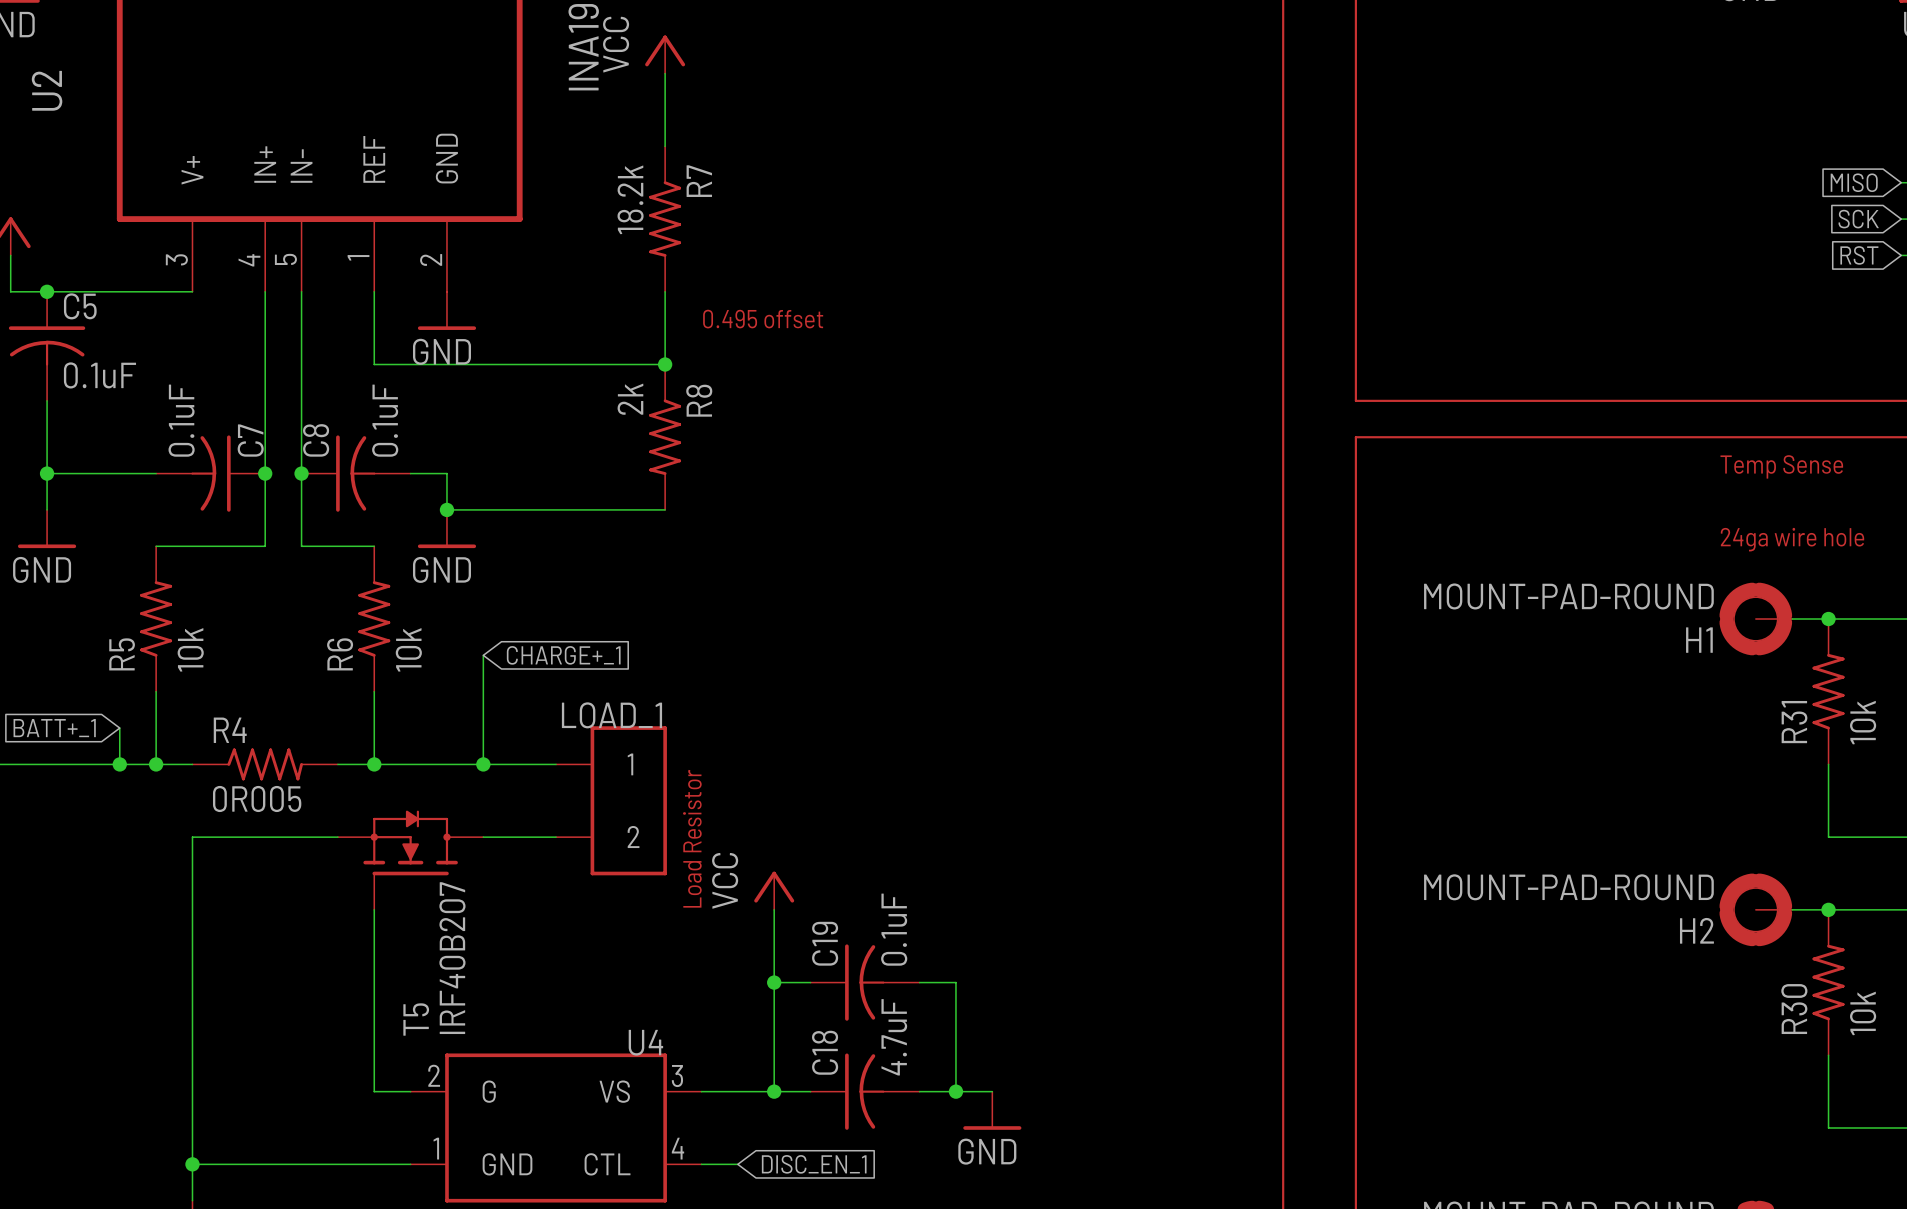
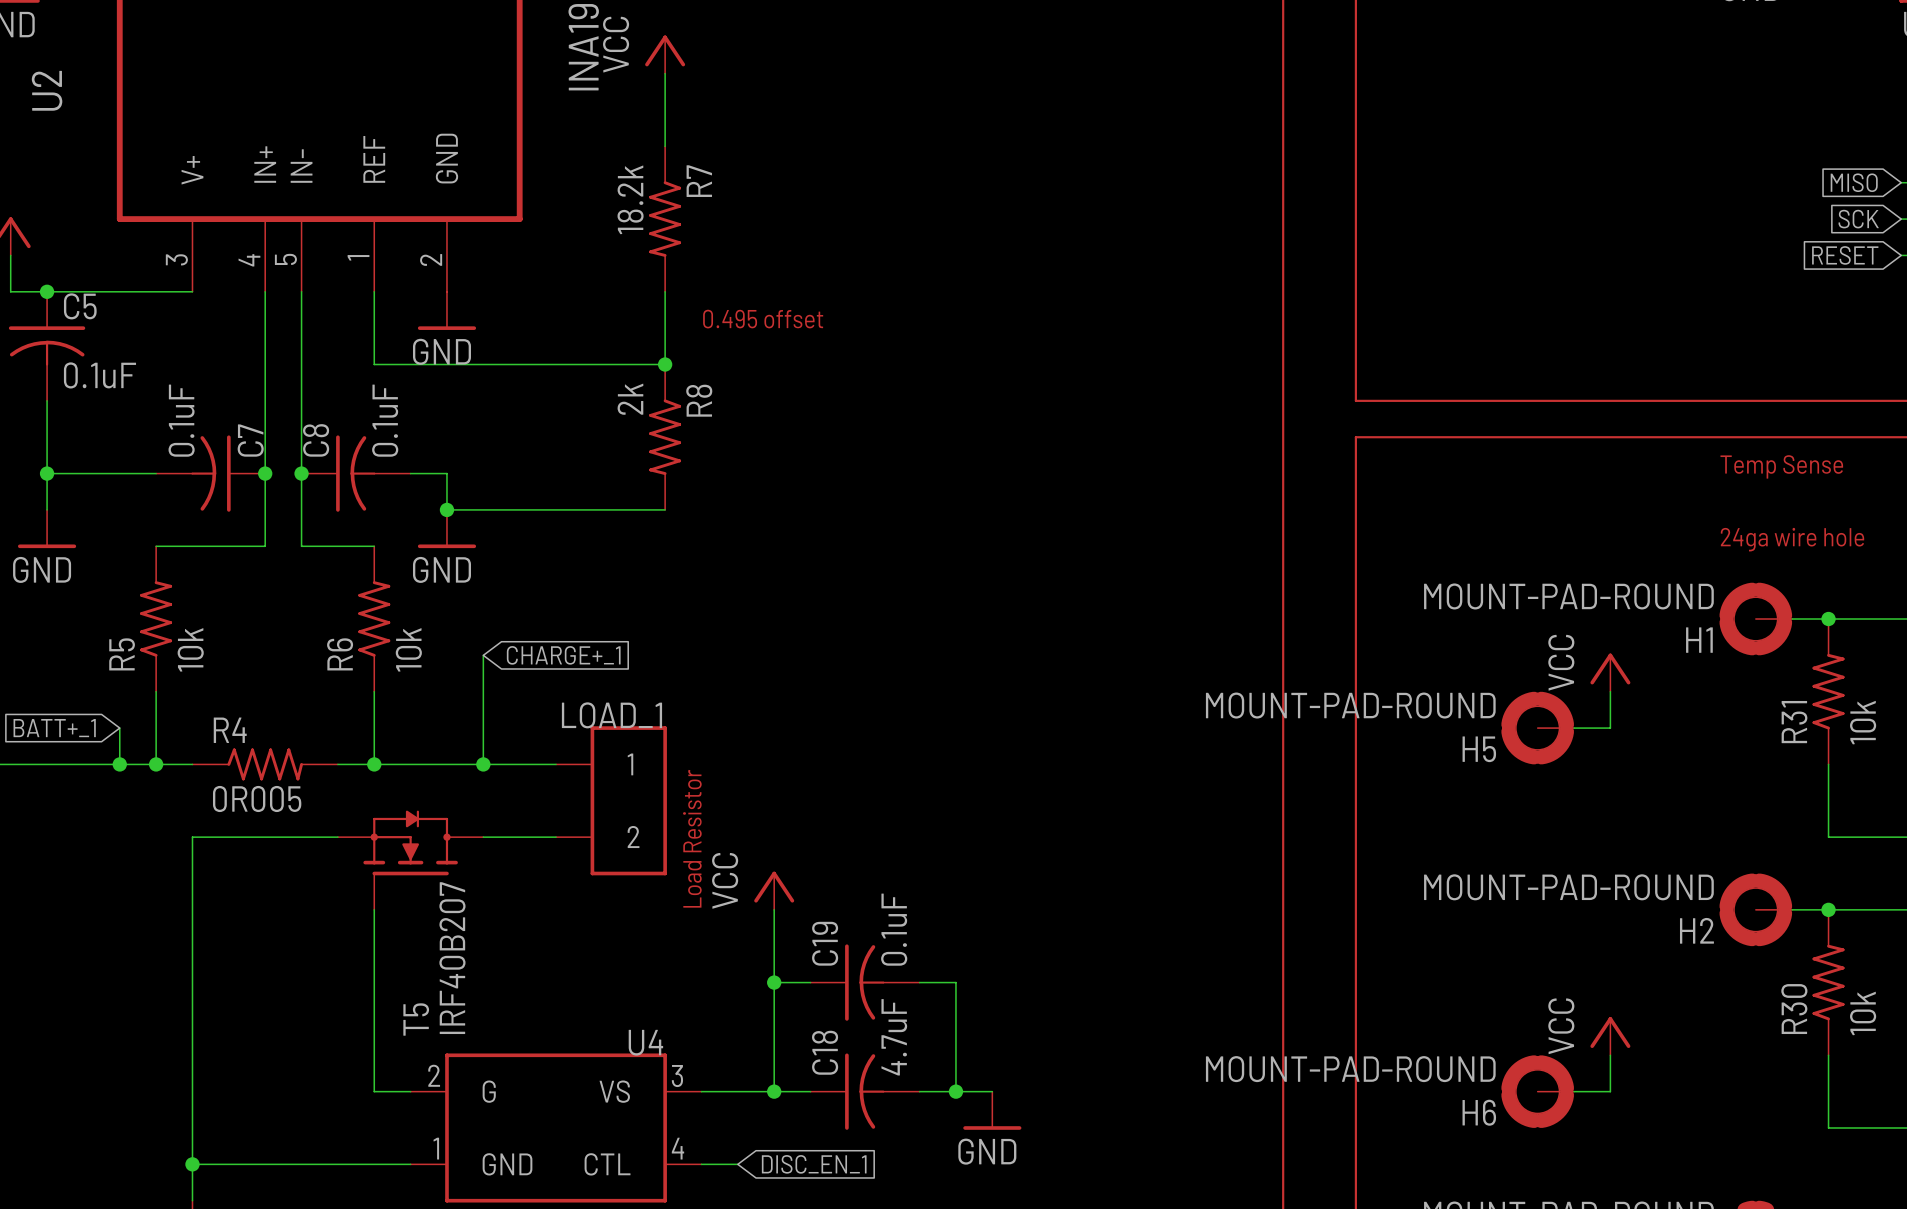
global label: RST (1859, 255) -> RESET (1845, 255)
power symbol: none -> VCC (1610, 672)
wire: none -> (1610, 691) (1610, 728) (1574, 728)
H5: none -> MOUNT-PAD-ROUND (1537, 728)
power symbol: none -> VCC (1610, 1036)
wire: none -> (1610, 1055) (1610, 1091) (1574, 1091)
H6: none -> MOUNT-PAD-ROUND (1537, 1091)

